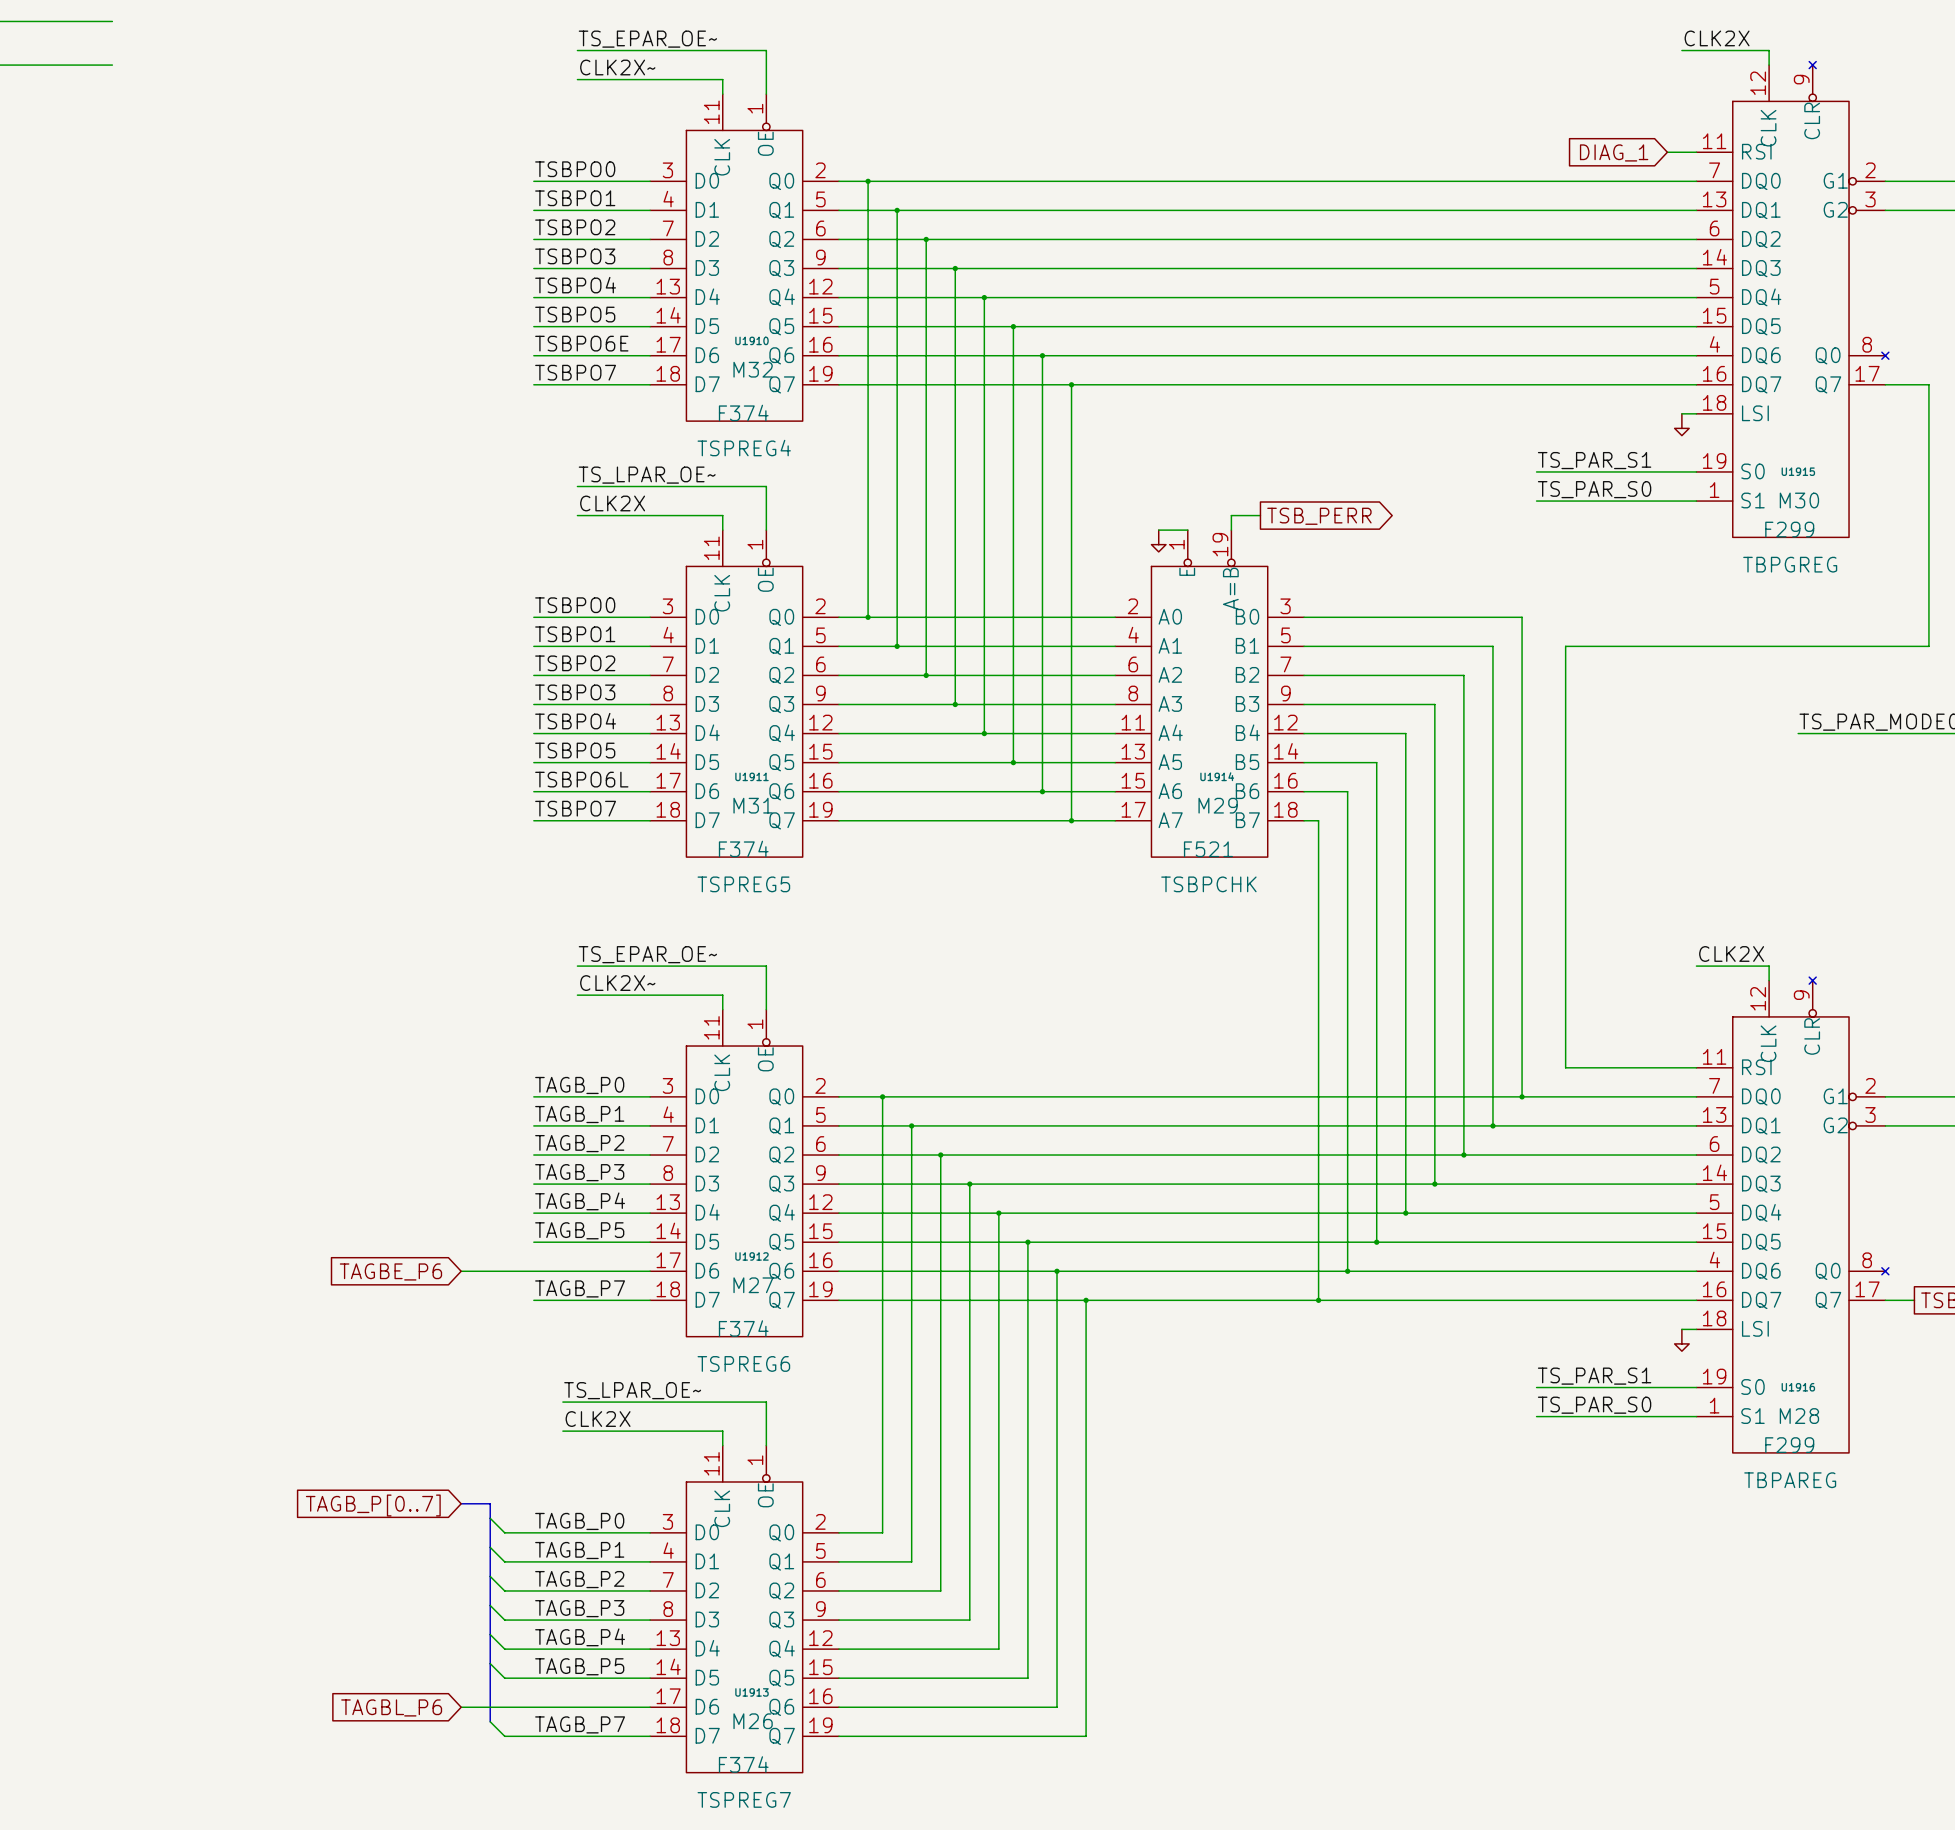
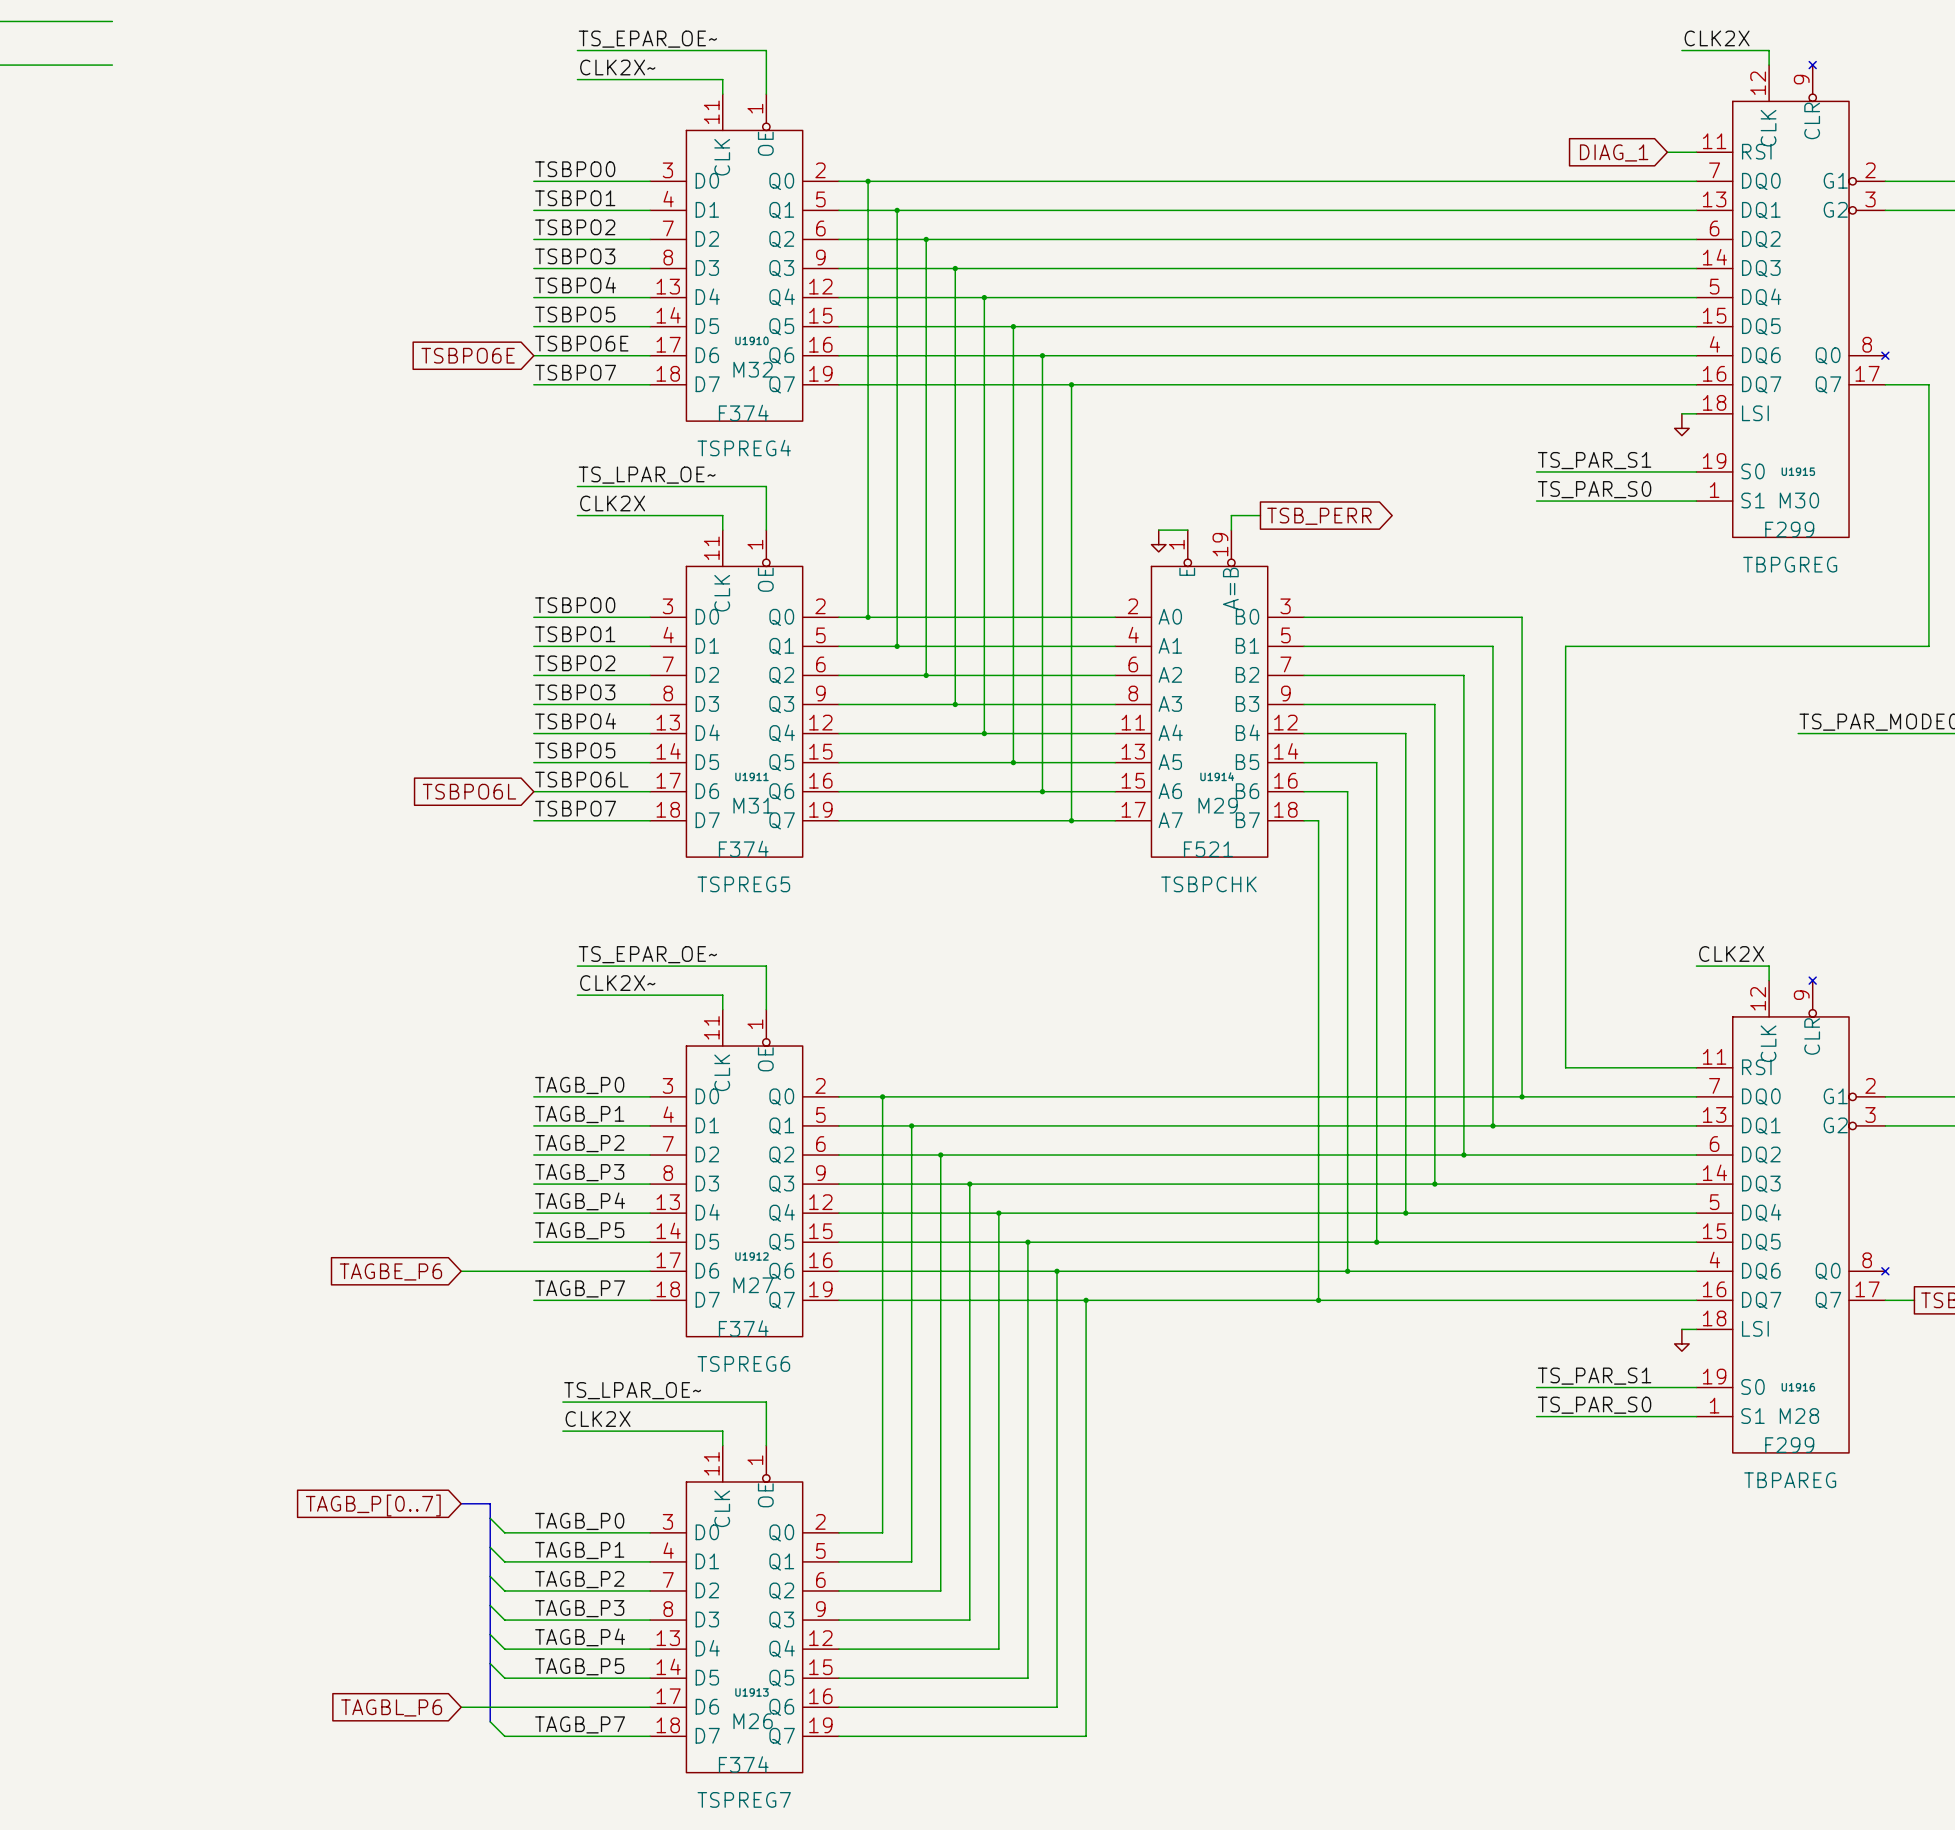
global label: none -> TSBPO6E (468, 355)
global label: none -> TSBPO6L (469, 791)

